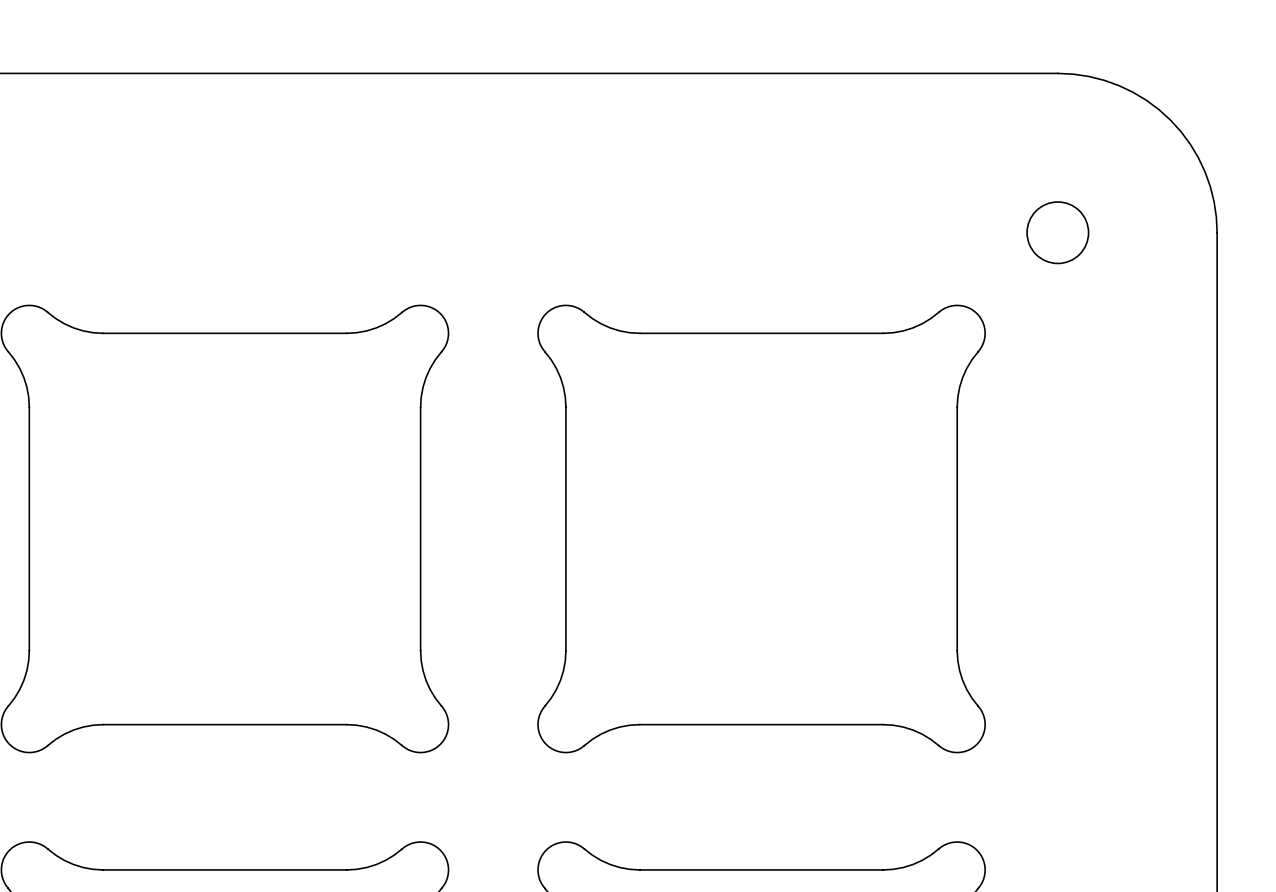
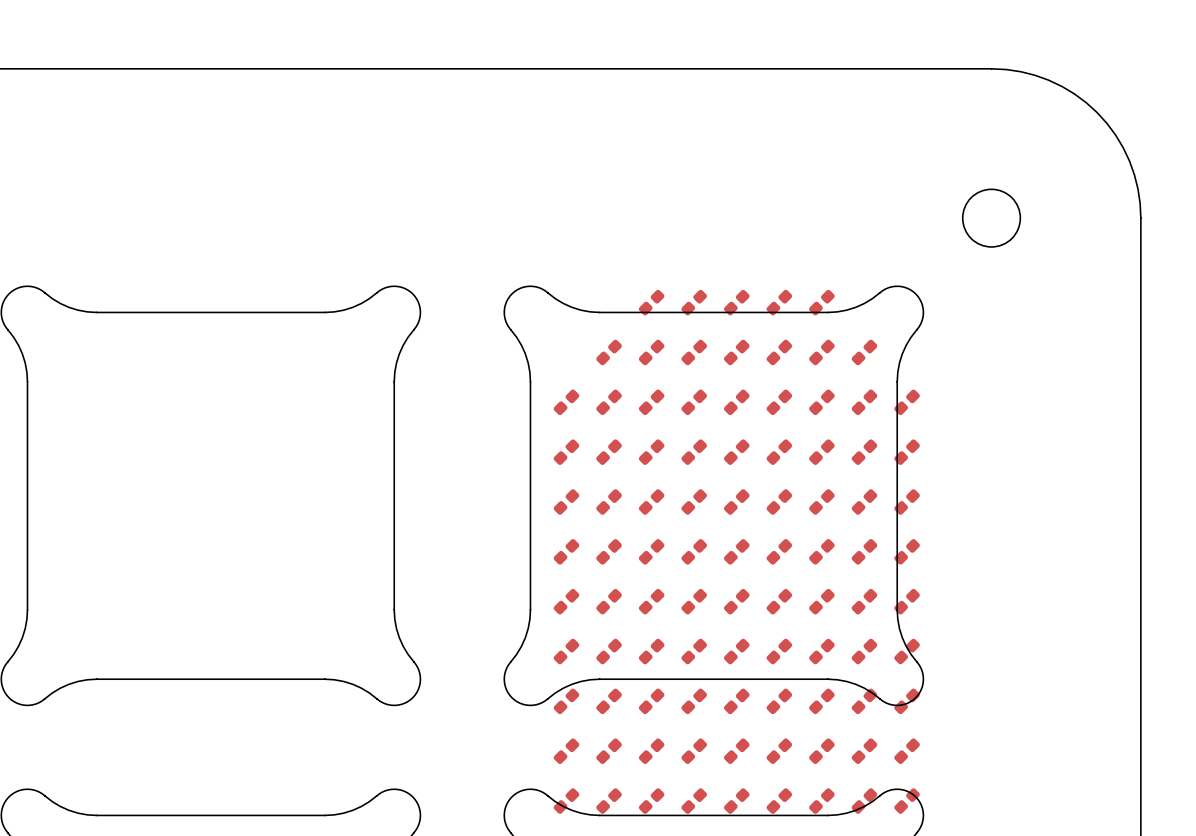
part: none -> (651, 302)
part: none -> (694, 302)
part: none -> (736, 302)
part: none -> (779, 302)
part: none -> (821, 302)
part: none -> (609, 352)
part: none -> (651, 352)
part: none -> (694, 352)
part: none -> (736, 352)
part: none -> (779, 352)
part: none -> (821, 352)
part: none -> (864, 352)
part: none -> (566, 402)
part: none -> (609, 402)
part: none -> (651, 402)
part: none -> (694, 402)
part: none -> (736, 402)
part: none -> (779, 402)
part: none -> (821, 402)
part: none -> (864, 402)
part: none -> (907, 402)
part: none -> (566, 452)
part: none -> (609, 452)
part: none -> (651, 452)
part: none -> (694, 452)
part: none -> (736, 452)
part: none -> (779, 452)
part: none -> (821, 452)
part: none -> (864, 452)
part: none -> (907, 452)
part: none -> (566, 502)
part: none -> (609, 502)
part: none -> (651, 502)
part: none -> (694, 502)
part: none -> (736, 502)
part: none -> (779, 502)
part: none -> (821, 502)
part: none -> (864, 502)
part: none -> (907, 502)
part: none -> (566, 551)
part: none -> (609, 551)
part: none -> (651, 551)
part: none -> (694, 551)
part: none -> (736, 551)
part: none -> (779, 551)
part: none -> (821, 551)
part: none -> (864, 551)
part: none -> (907, 551)
part: none -> (566, 601)
part: none -> (609, 601)
part: none -> (651, 601)
part: none -> (694, 601)
part: none -> (736, 601)
part: none -> (779, 601)
part: none -> (821, 601)
part: none -> (864, 601)
part: none -> (907, 601)
part: none -> (566, 651)
part: none -> (609, 651)
part: none -> (651, 651)
part: none -> (694, 651)
part: none -> (736, 651)
part: none -> (779, 651)
part: none -> (821, 651)
part: none -> (864, 651)
part: none -> (907, 651)
part: none -> (566, 701)
part: none -> (609, 701)
part: none -> (651, 701)
part: none -> (694, 701)
part: none -> (736, 701)
part: none -> (779, 701)
part: none -> (821, 701)
part: none -> (864, 701)
part: none -> (907, 701)
part: none -> (566, 751)
part: none -> (609, 751)
part: none -> (651, 751)
part: none -> (694, 751)
part: none -> (736, 751)
part: none -> (779, 751)
part: none -> (821, 751)
part: none -> (864, 751)
part: none -> (907, 751)
part: none -> (566, 801)
part: none -> (609, 801)
part: none -> (651, 801)
part: none -> (694, 801)
part: none -> (736, 801)
part: none -> (779, 801)
part: none -> (821, 801)
part: none -> (864, 801)
part: none -> (907, 801)

